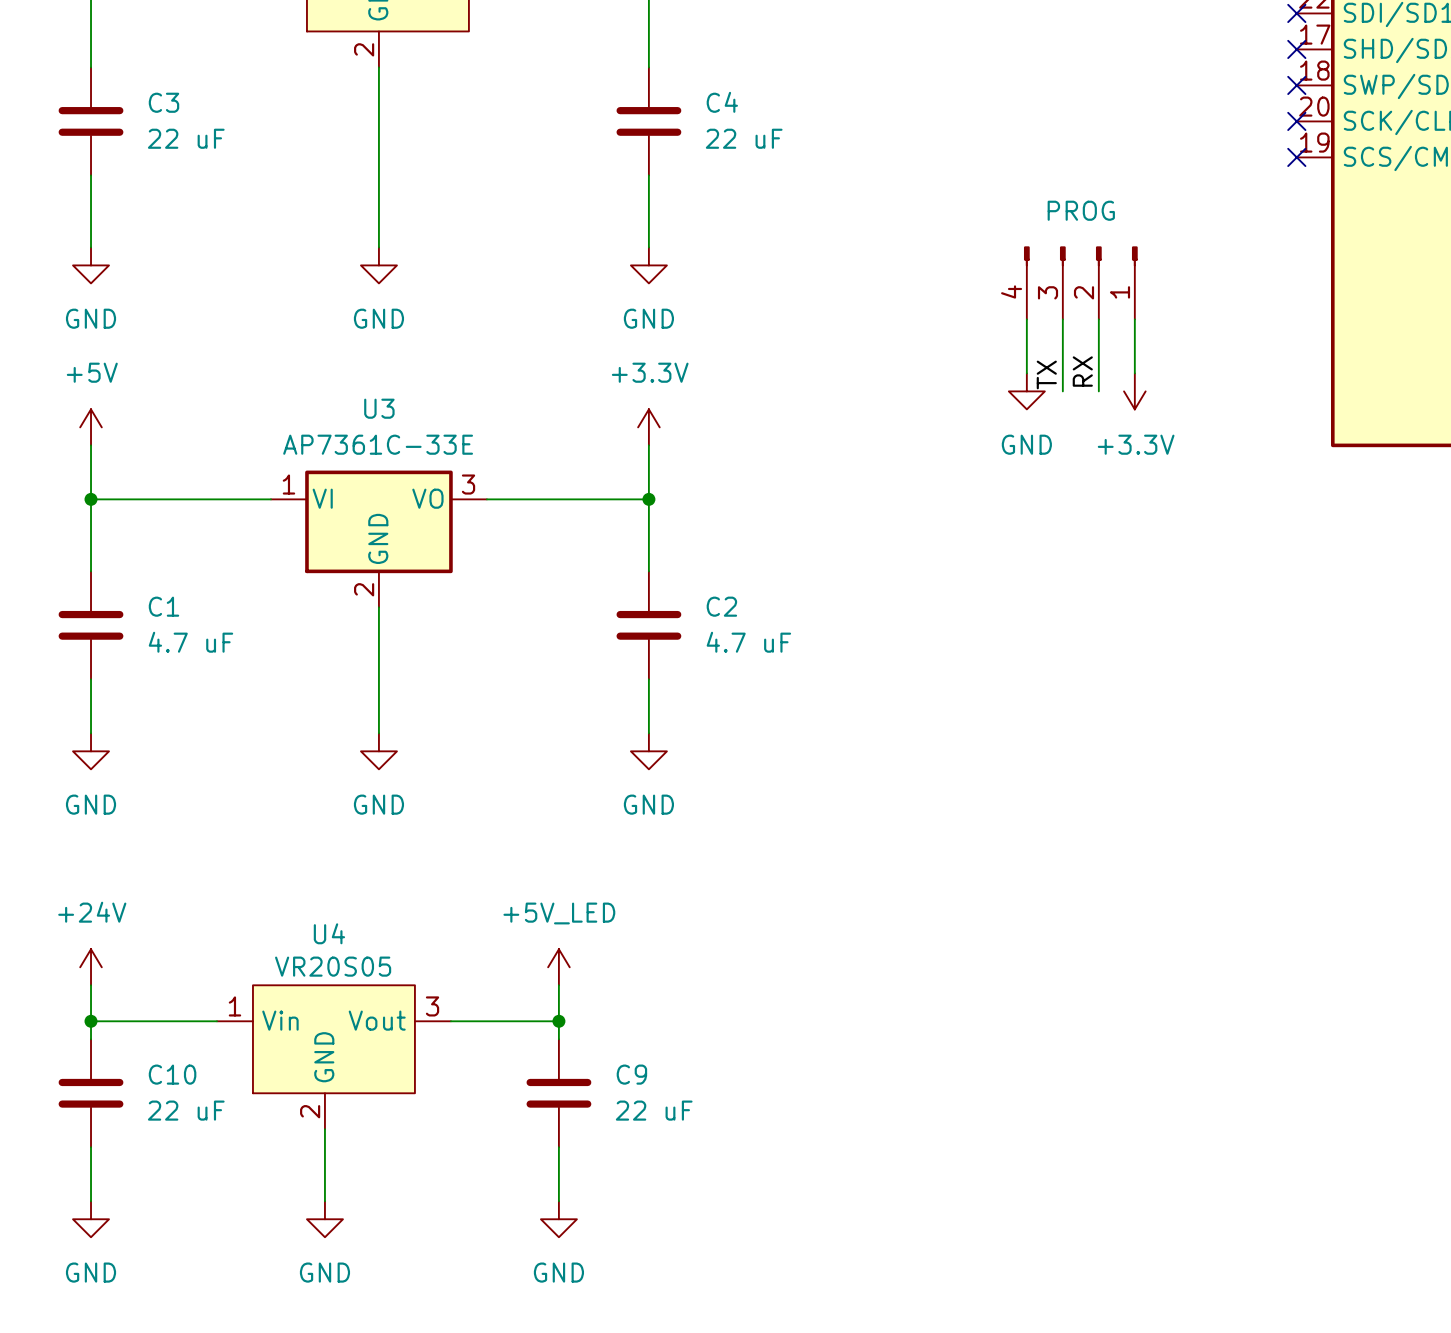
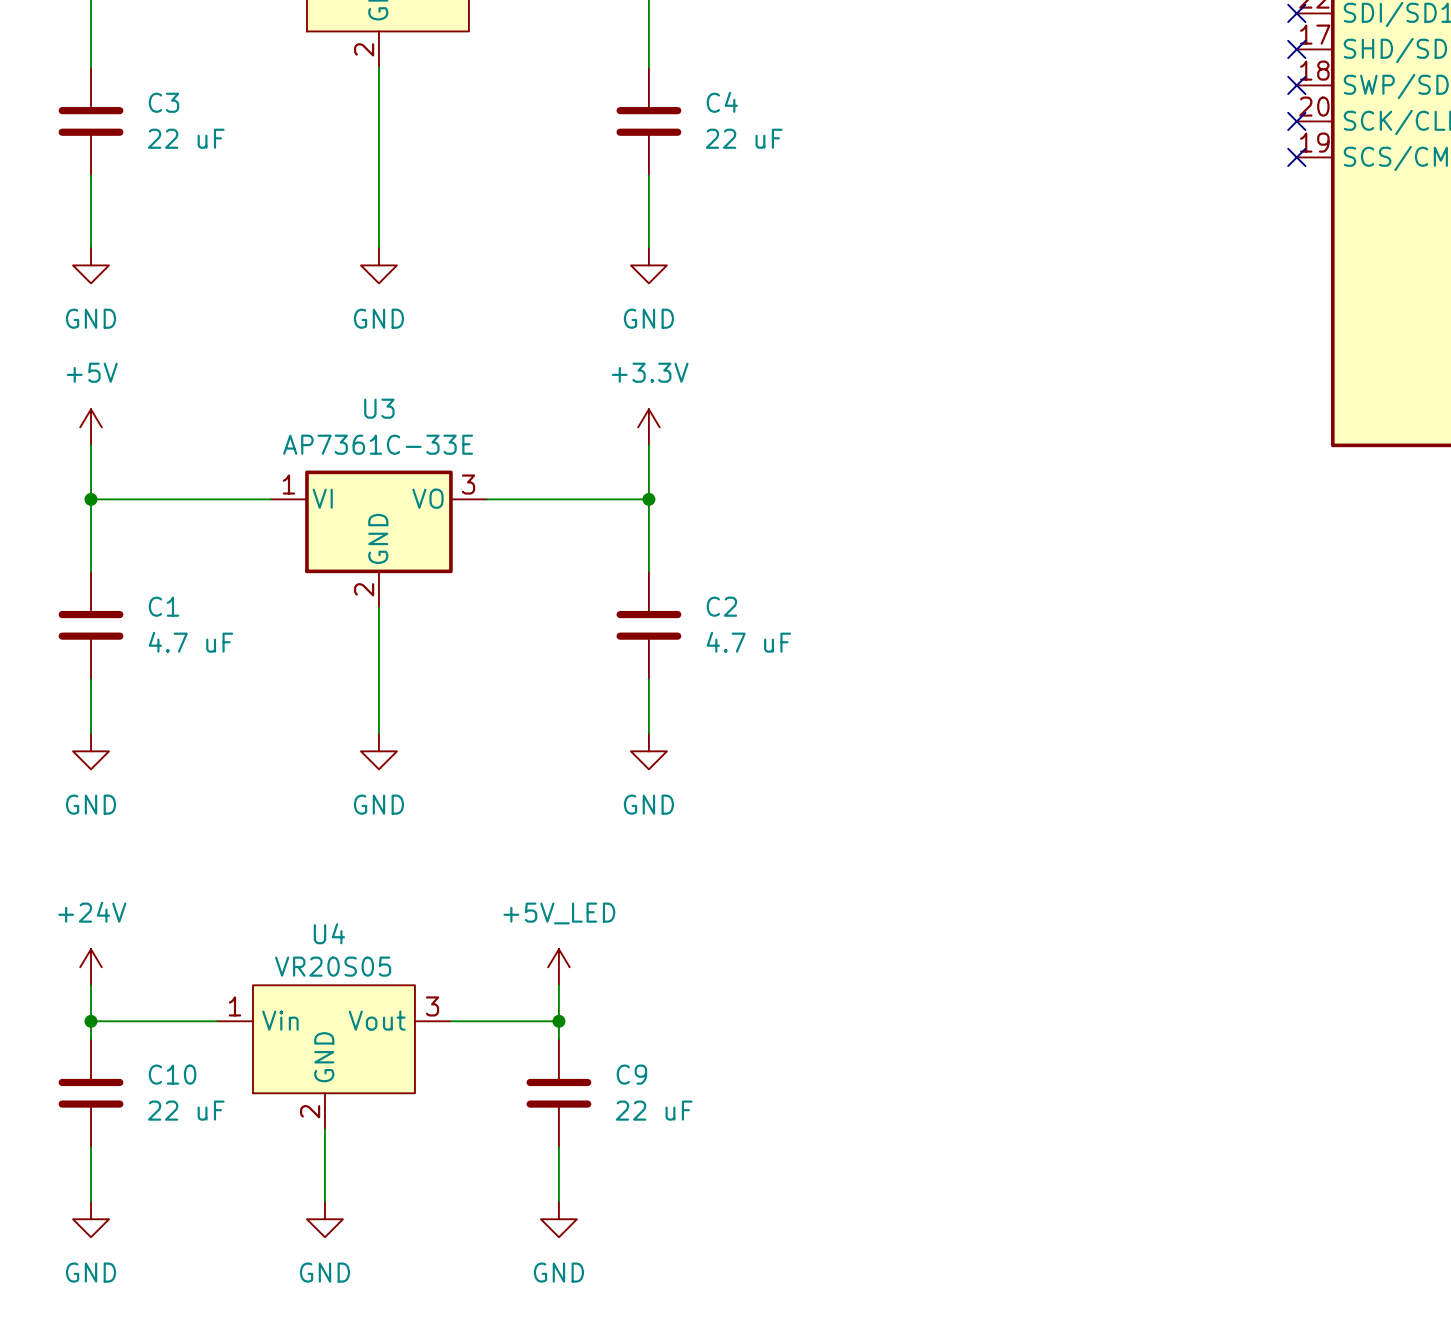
part: PROG (1080, 282) -> none
wire: (1026, 319) (1026, 373) -> none
wire: (1062, 319) (1062, 391) -> none
wire: (1098, 319) (1098, 391) -> none
wire: (1134, 319) (1134, 373) -> none
label: RX (1082, 371) -> none
label: TX (1046, 374) -> none
power symbol: GND (1026, 391) -> none
power symbol: +3.3V (1134, 391) -> none

